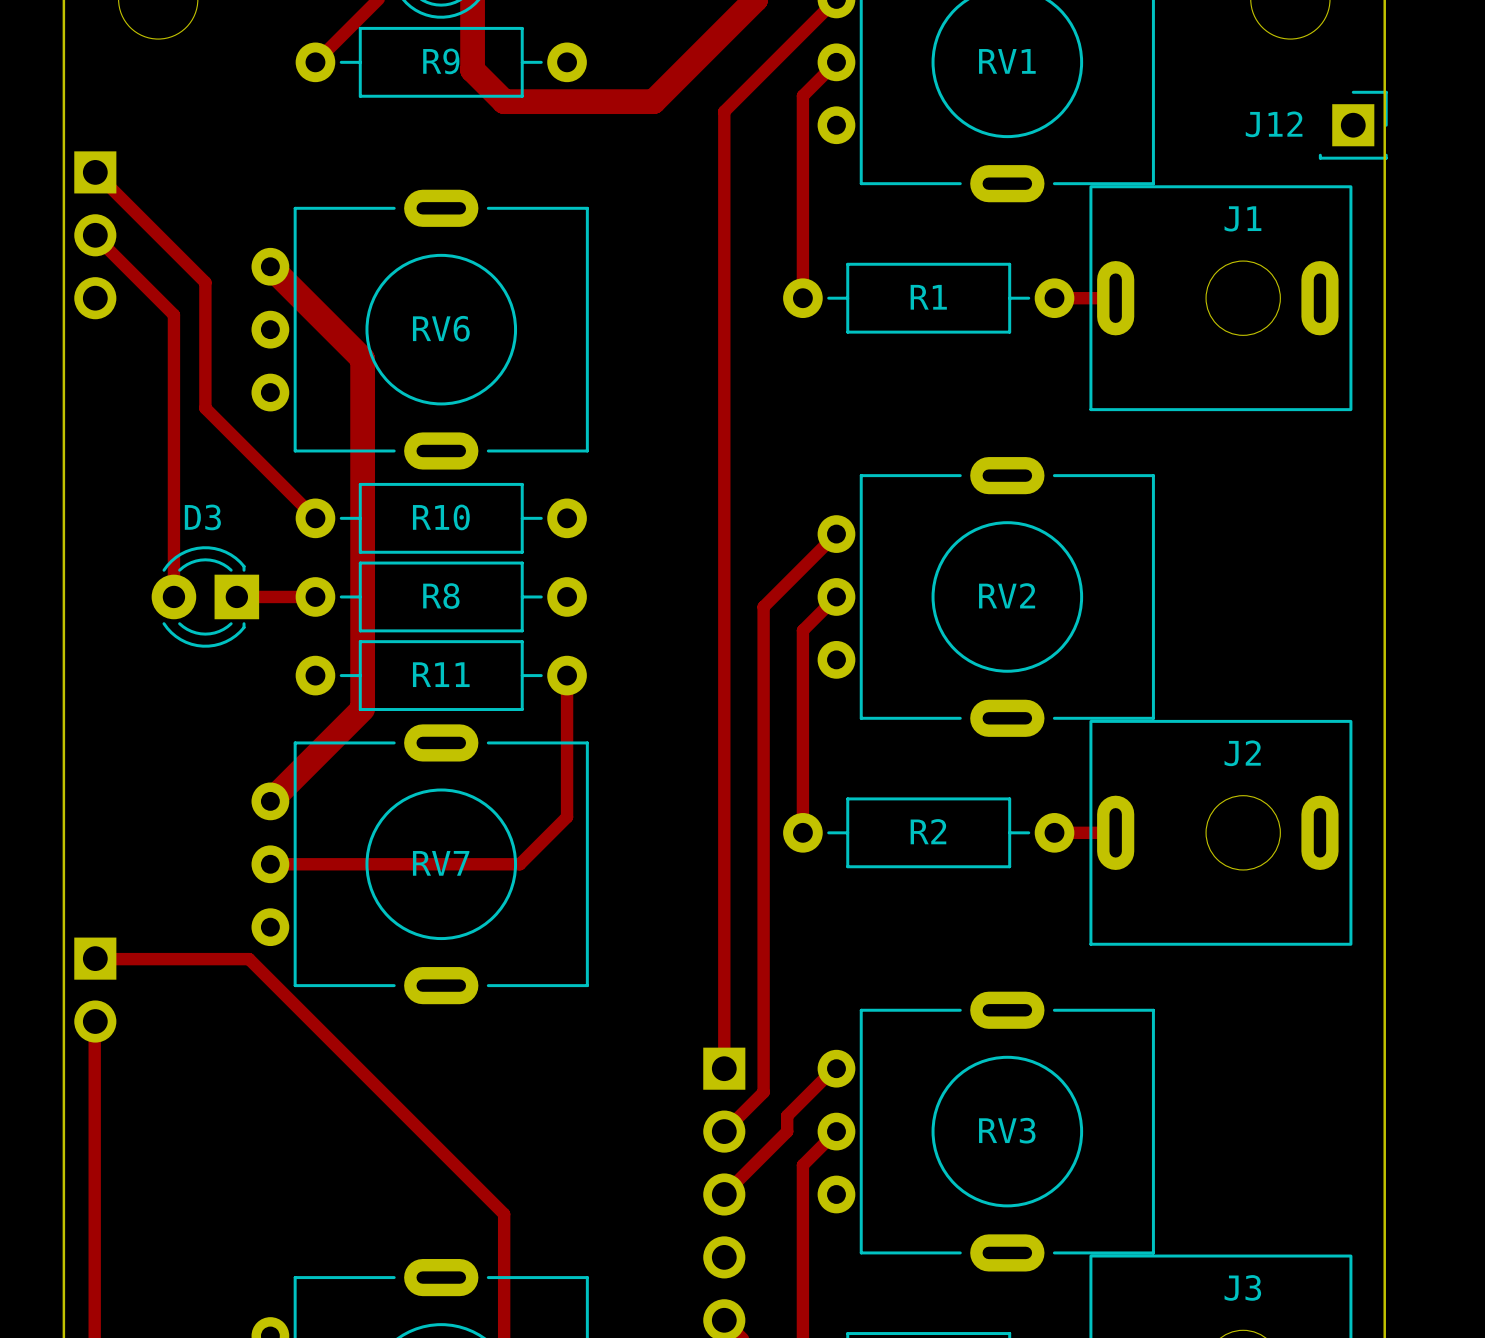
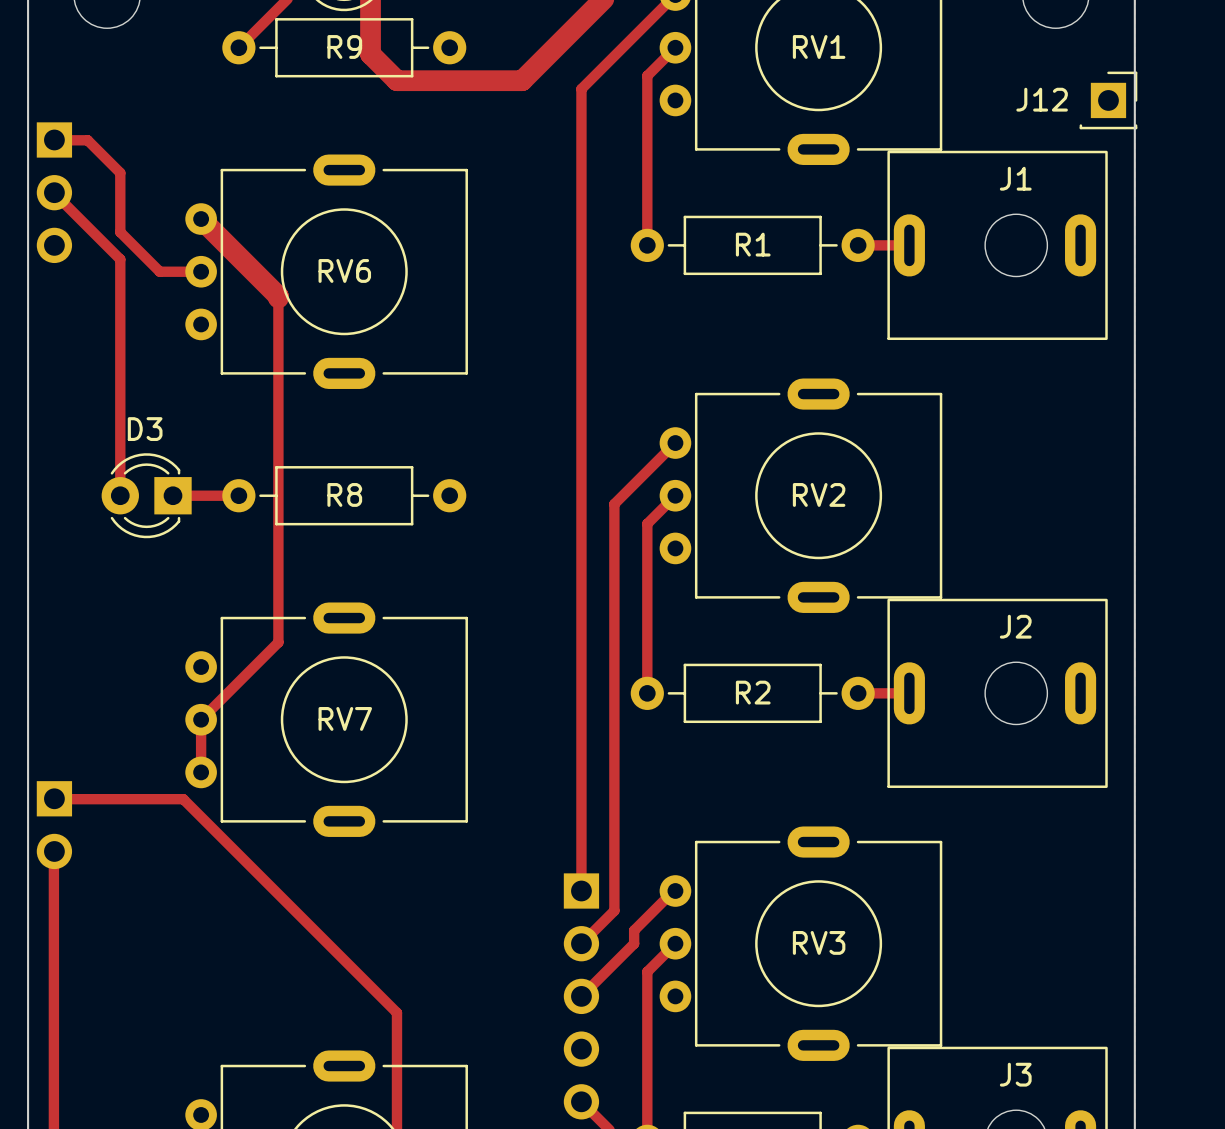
track: (95, 172) (205, 282) (205, 408) (315, 518) -> (53, 140) (87, 140) (120, 172) (120, 232) (159, 271) (199, 271)
track width: thick (362, 361) (362, 707) -> thin (278, 298) (278, 587)
R10: (441, 518) -> none
R11: (441, 675) -> none
track: (567, 675) (567, 817) (519, 864) (270, 864) -> none
track: none -> (278, 587) (278, 642) (201, 719) (201, 772)
track: (362, 709) (270, 801) -> none

